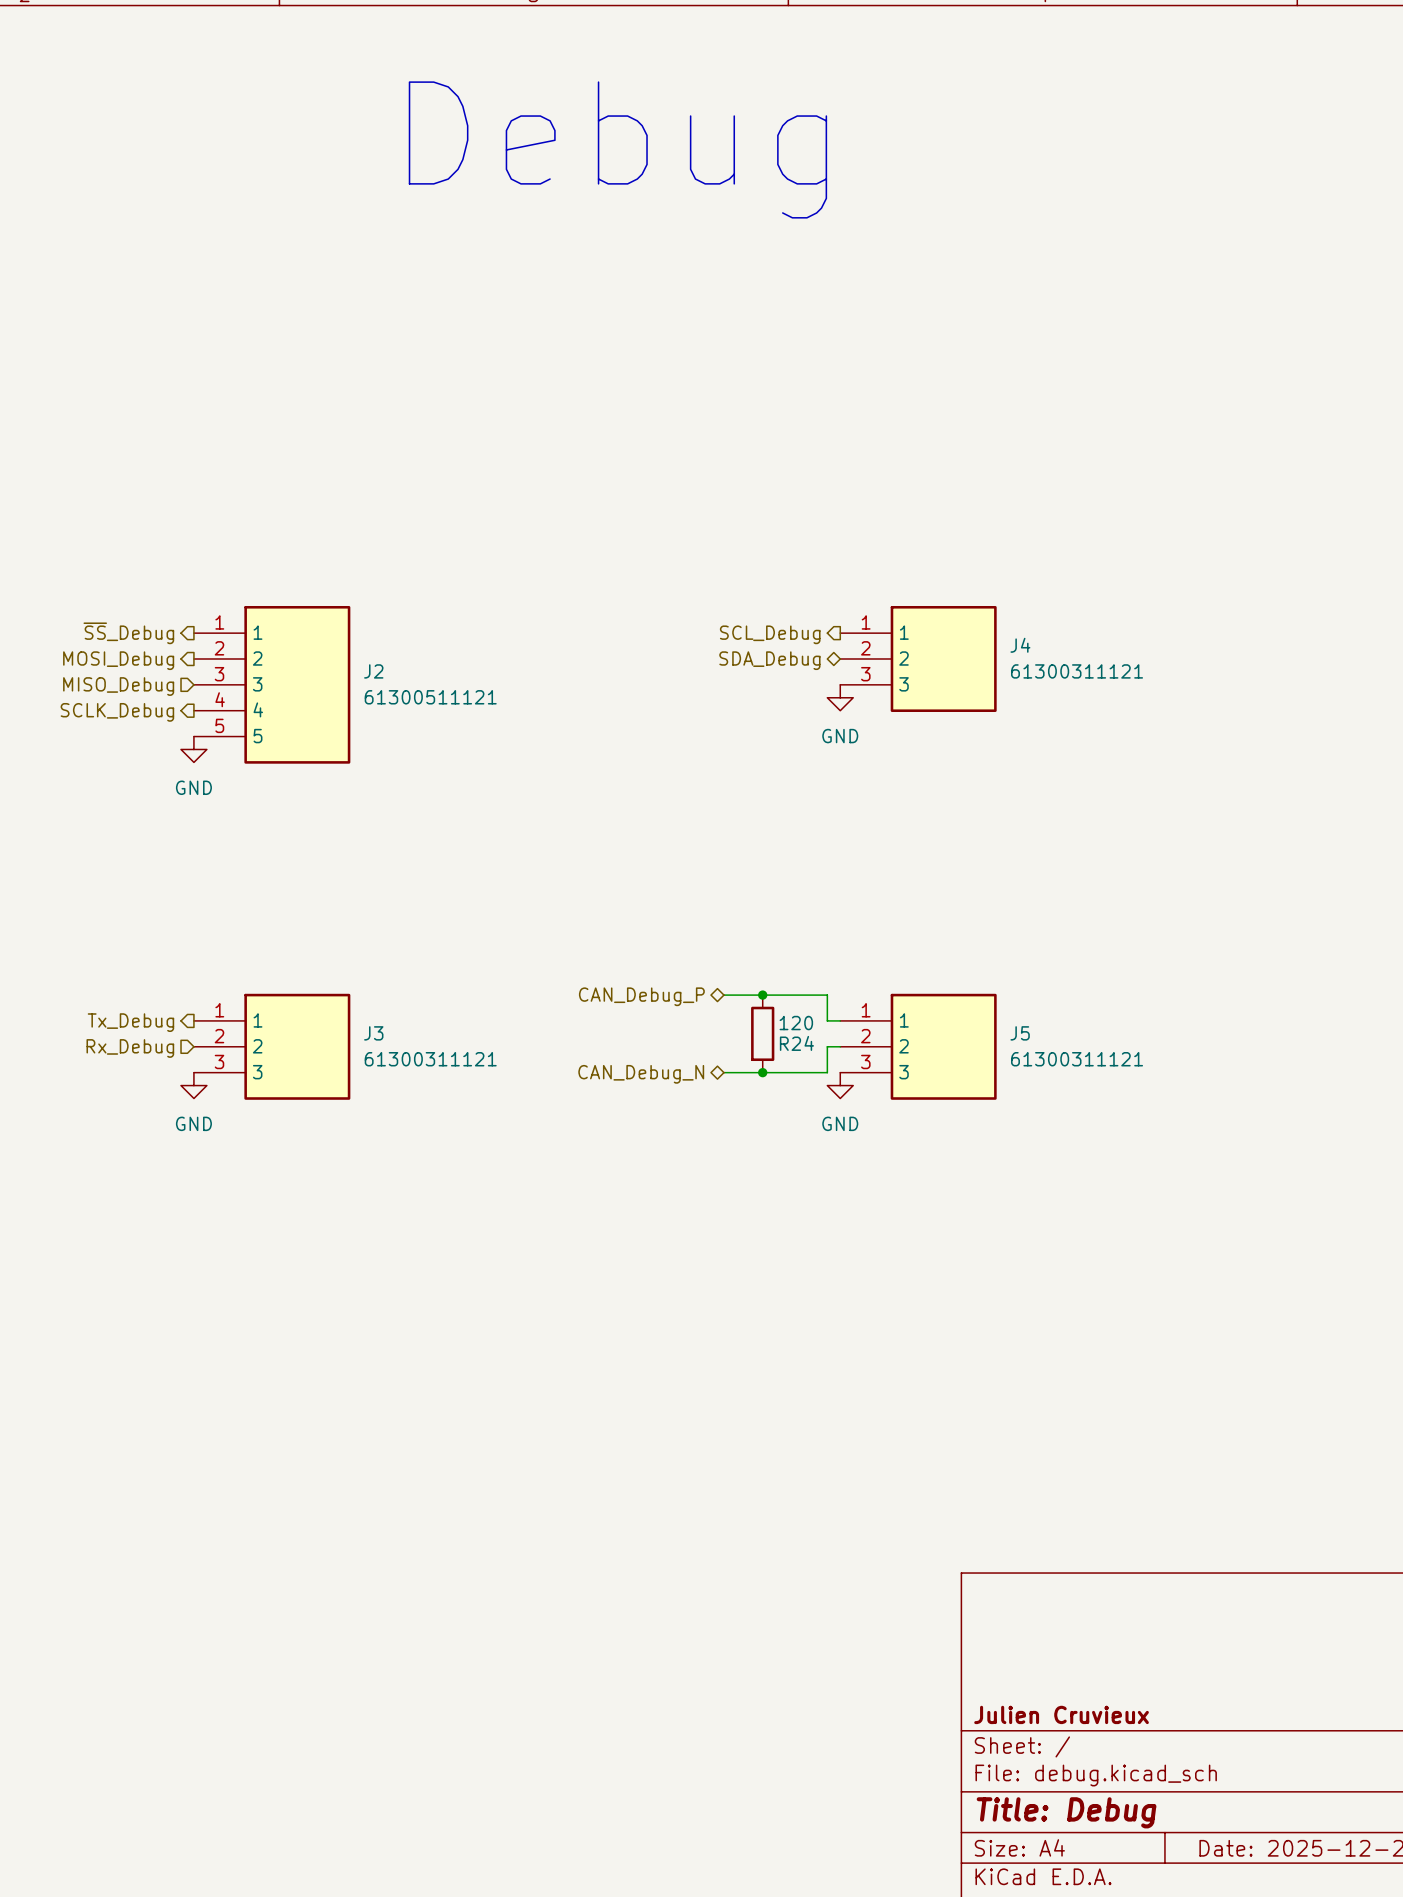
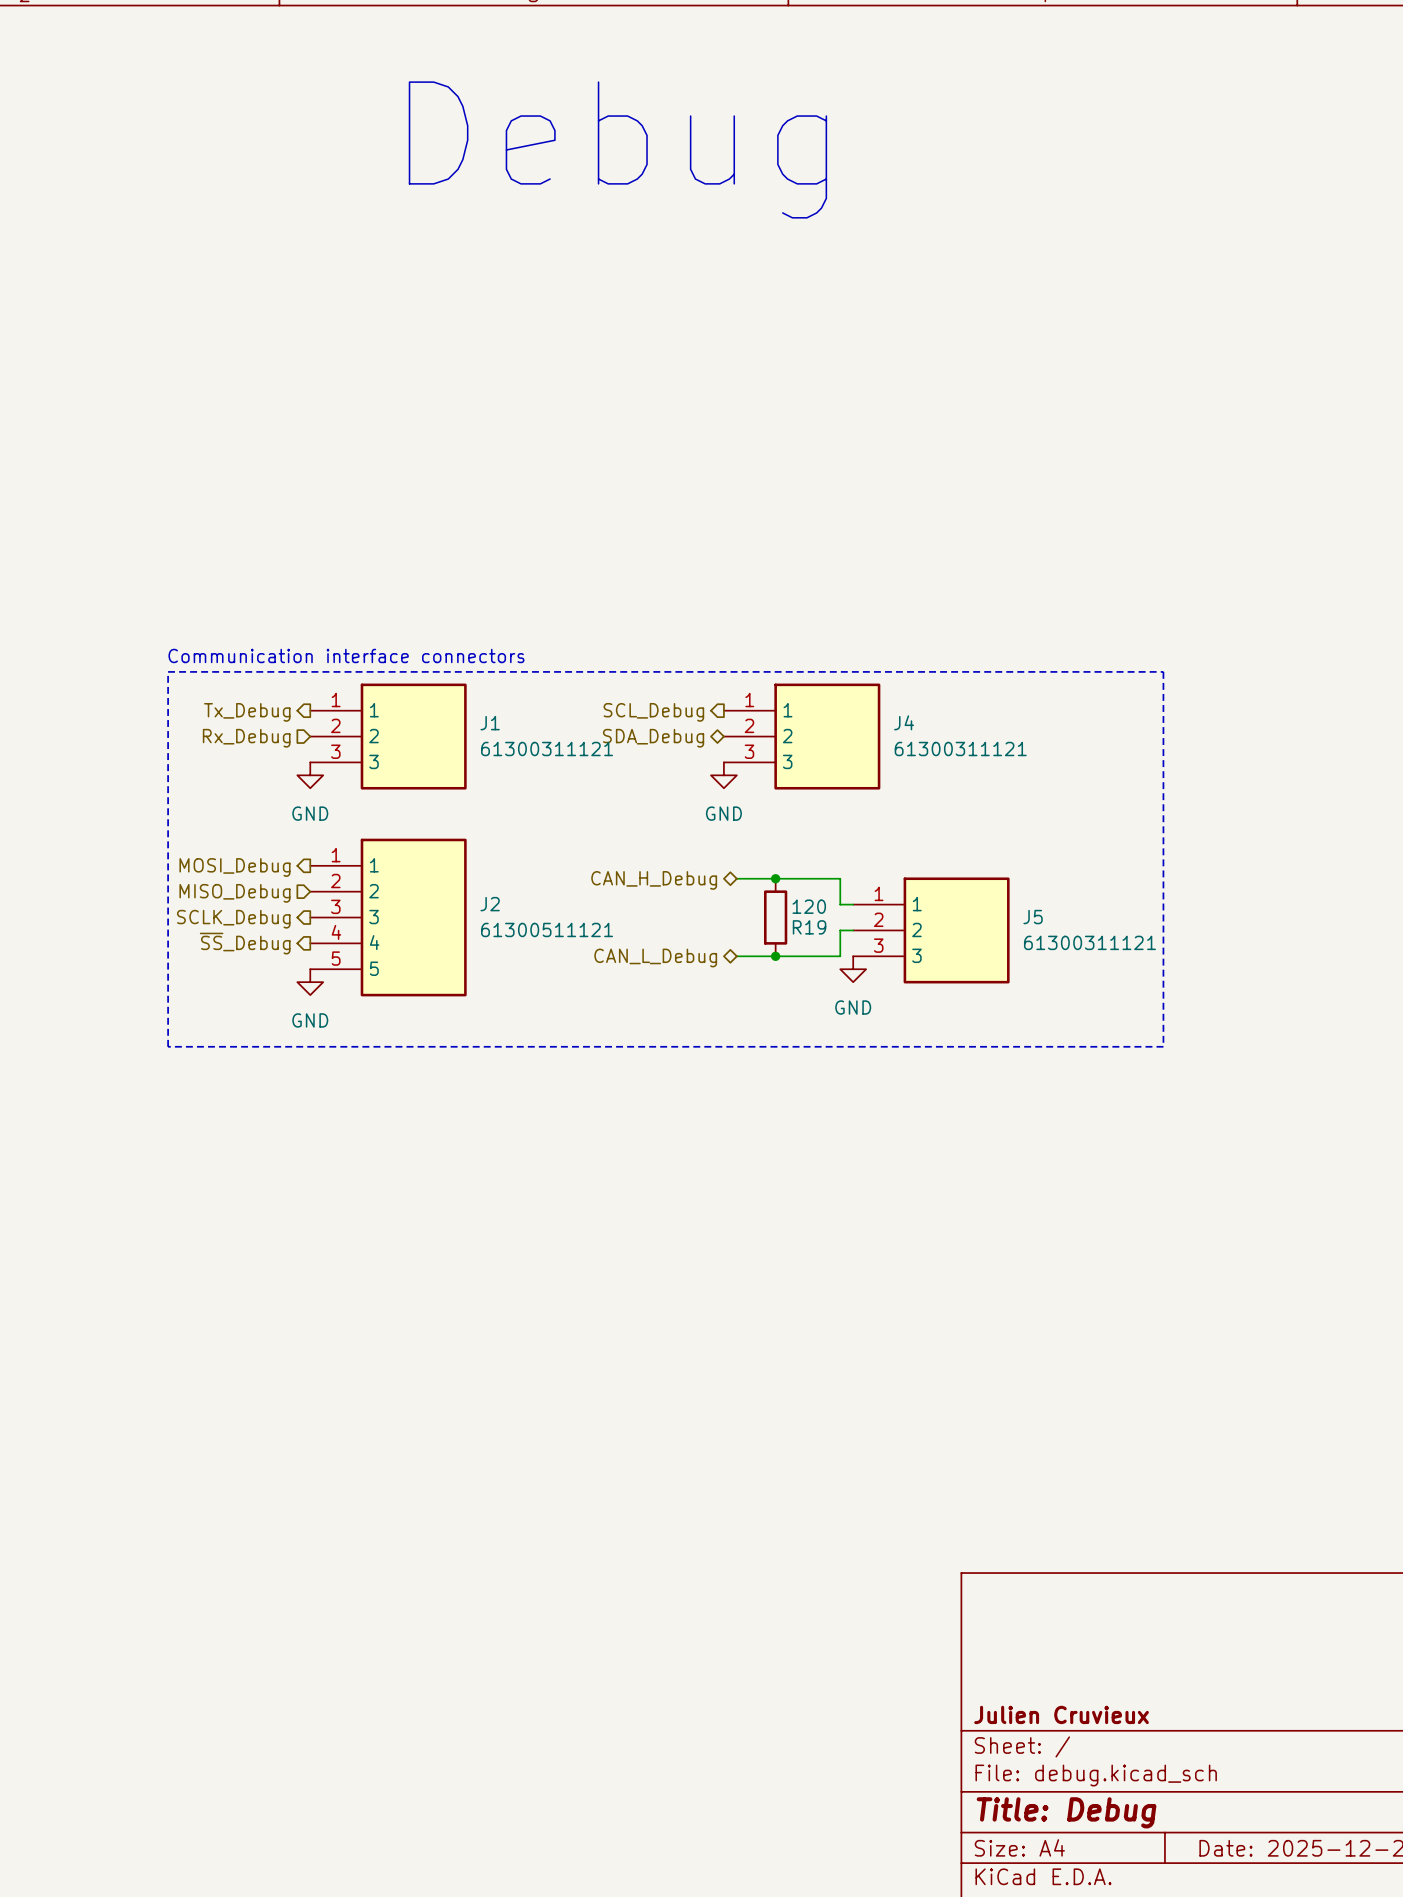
hierarchical label: ~{SS}_Debug (128, 633) -> none
hierarchical label position: SCL_Debug (770, 634) -> SCL_Debug (653, 712)
text: none -> Communication interface connectors (346, 655)
J4 position: (918, 658) -> (802, 736)
hierarchical label position: MOSI_Debug (118, 660) -> MOSI_Debug (234, 867)
hierarchical label position: SDA_Debug (769, 660) -> SDA_Debug (653, 738)
line: none -> (168, 671) (1163, 671) (1163, 1046) (168, 1046) (168, 671)
J2 position: (272, 684) -> (388, 917)
hierarchical label position: MISO_Debug (118, 686) -> MISO_Debug (234, 893)
power symbol: GND (840, 697) -> none
hierarchical label position: SCLK_Debug (117, 712) -> SCLK_Debug (233, 919)
hierarchical label: none -> Tx_Debug (247, 712)
J1: none -> 61300311121 (388, 736)
hierarchical label: none -> Rx_Debug (246, 738)
power symbol position: GND (193, 749) -> GND (310, 775)
power symbol: none -> GND (723, 775)
junction: none -> (775, 878)
hierarchical label: none -> CAN_H_Debug (654, 880)
R19: none -> 120 (775, 917)
hierarchical label: none -> ~{SS}_Debug (245, 943)
hierarchical label: none -> CAN_L_Debug (655, 957)
power symbol: none -> GND (310, 982)
wire: (723, 995) (827, 995) (827, 1020) (840, 1020) -> (736, 878) (840, 878) (840, 904) (853, 904)
junction position: (762, 995) -> (775, 956)
hierarchical label: CAN_Debug_P (641, 996) -> none
hierarchical label: Tx_Debug (130, 1022) -> none
R24: 120 (762, 1033) -> none
J3: 61300311121 (272, 1046) -> none
wire: (840, 1046) (827, 1046) (827, 1072) (723, 1072) -> (853, 930) (840, 930) (840, 956) (736, 956)
J5 position: (918, 1046) -> (931, 930)
hierarchical label: Rx_Debug (130, 1048) -> none
junction: (762, 1072) -> none
hierarchical label: CAN_Debug_N (641, 1074) -> none
power symbol: GND (193, 1085) -> none
power symbol position: GND (840, 1085) -> GND (853, 969)

